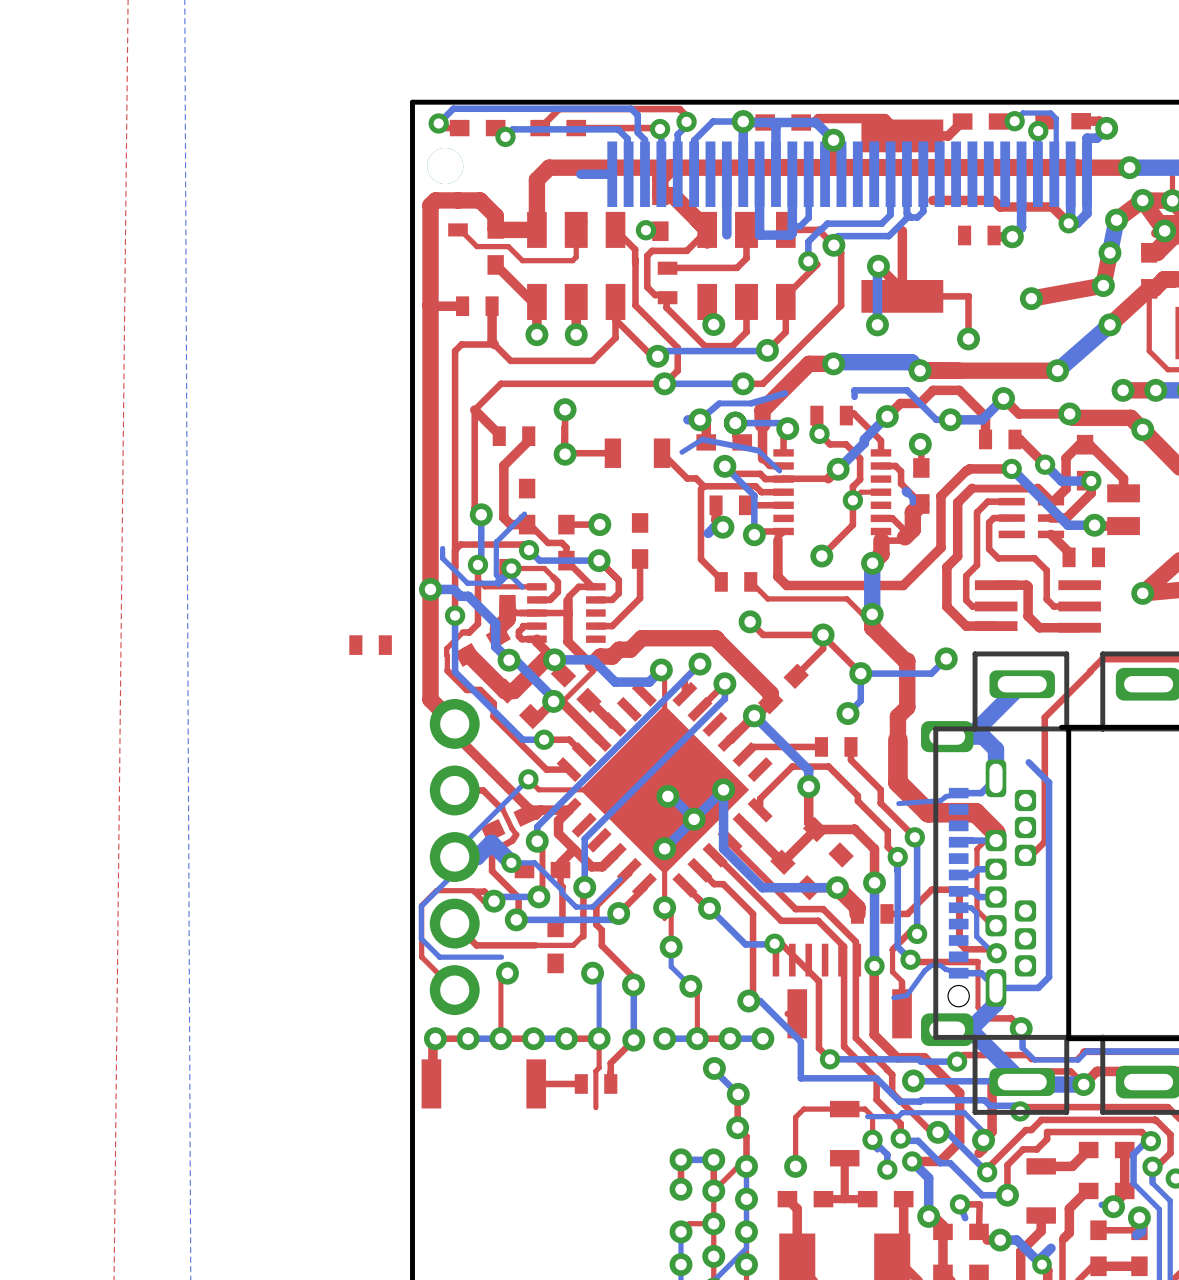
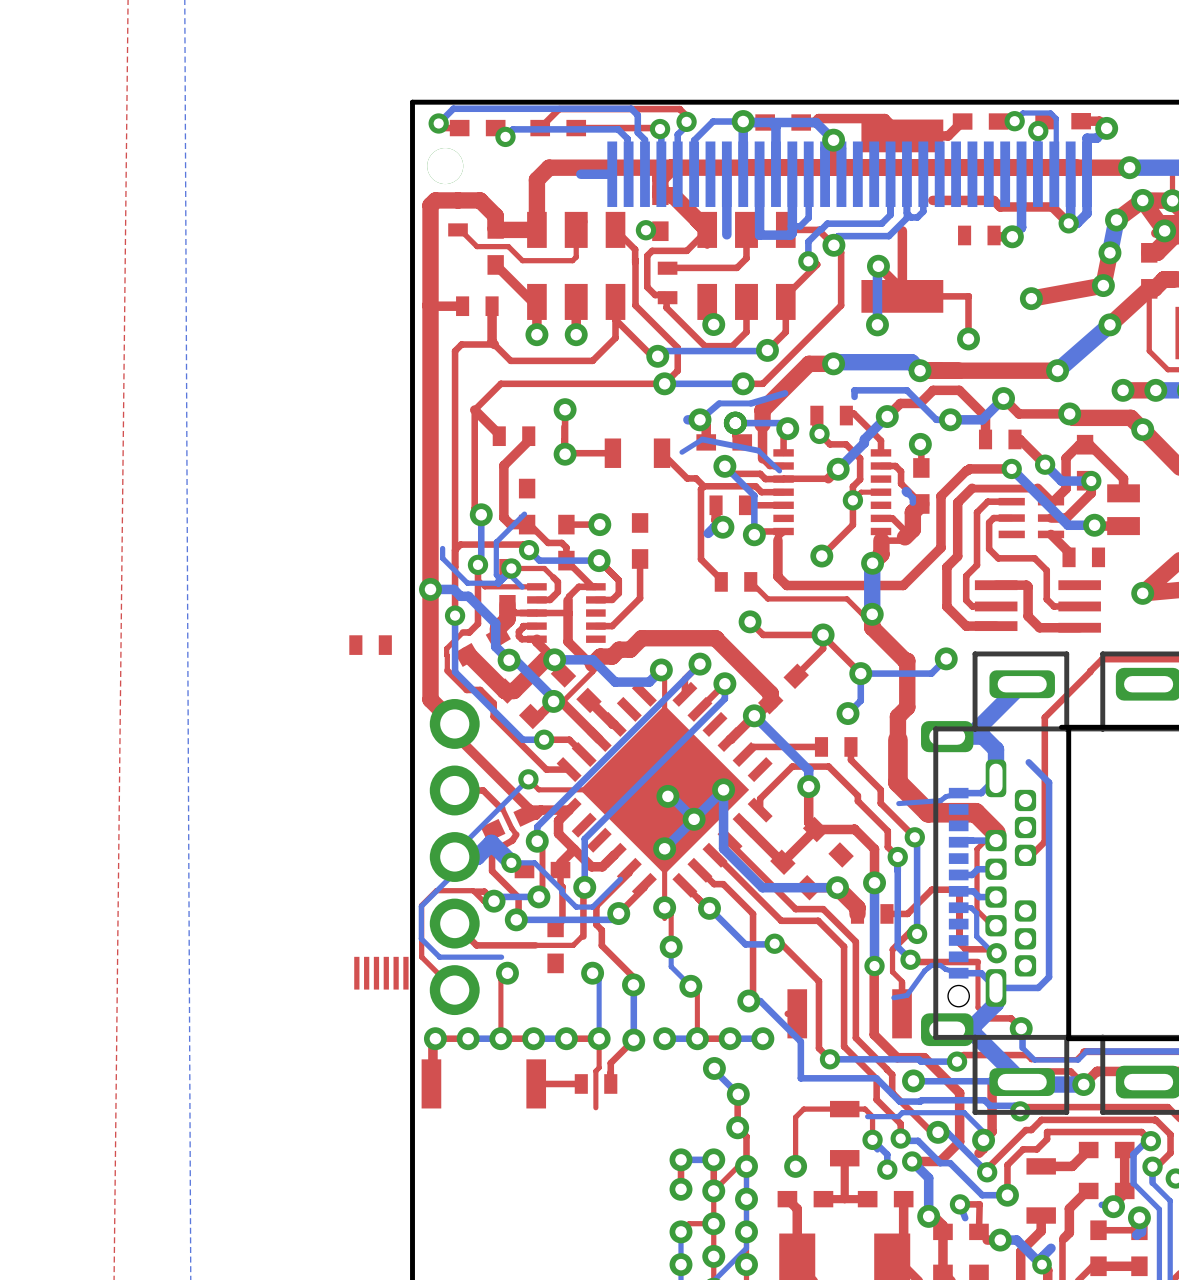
part: (816, 960) -> none
part: none -> (381, 973)

